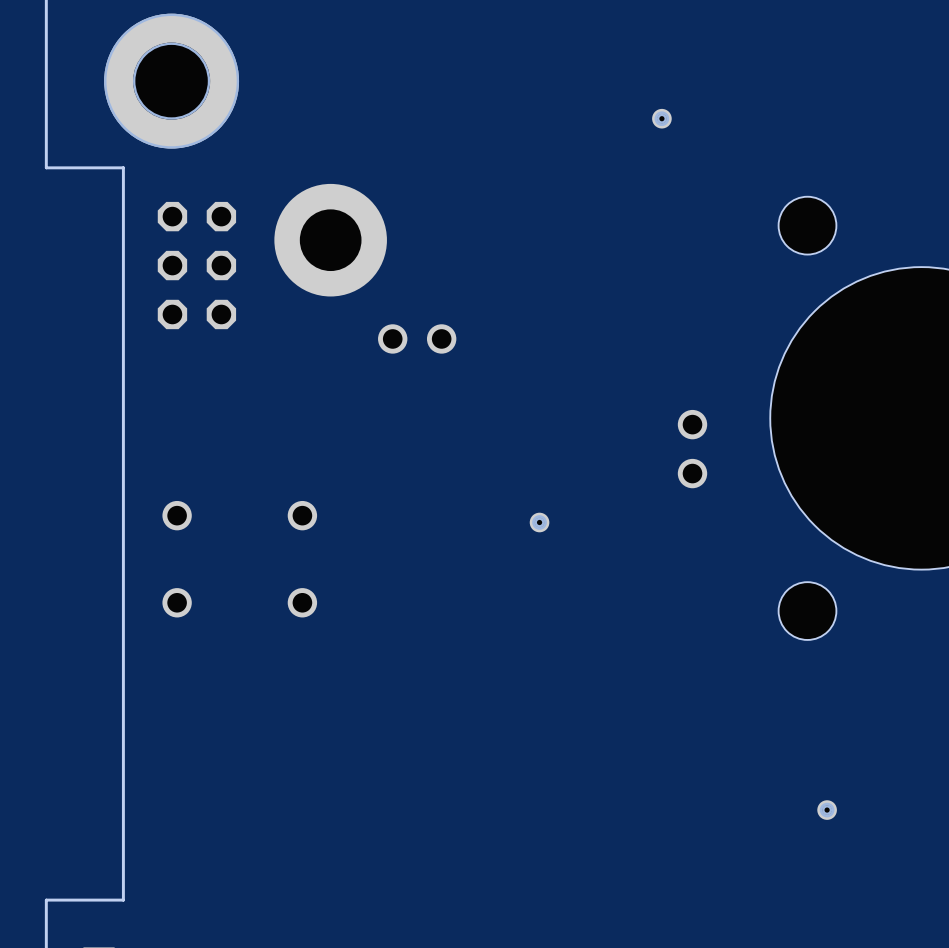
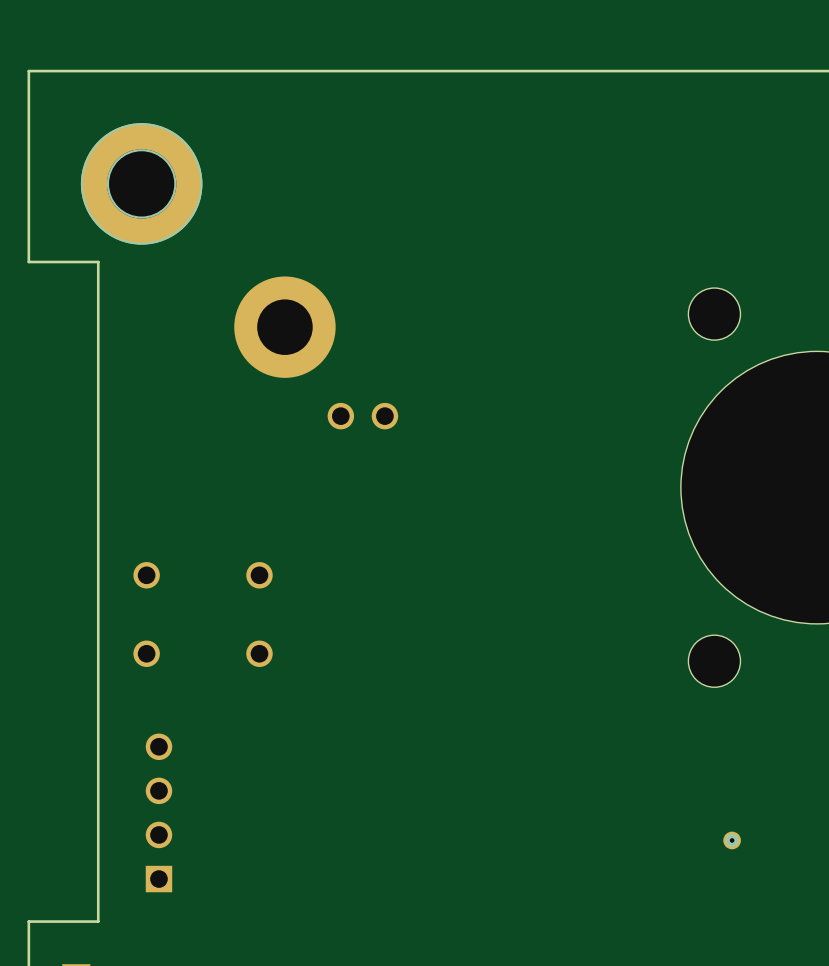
part: (661, 118) -> none
part: (196, 265) -> none
part: (692, 449) -> none
part: (539, 522) -> none
part: none -> (158, 812)

